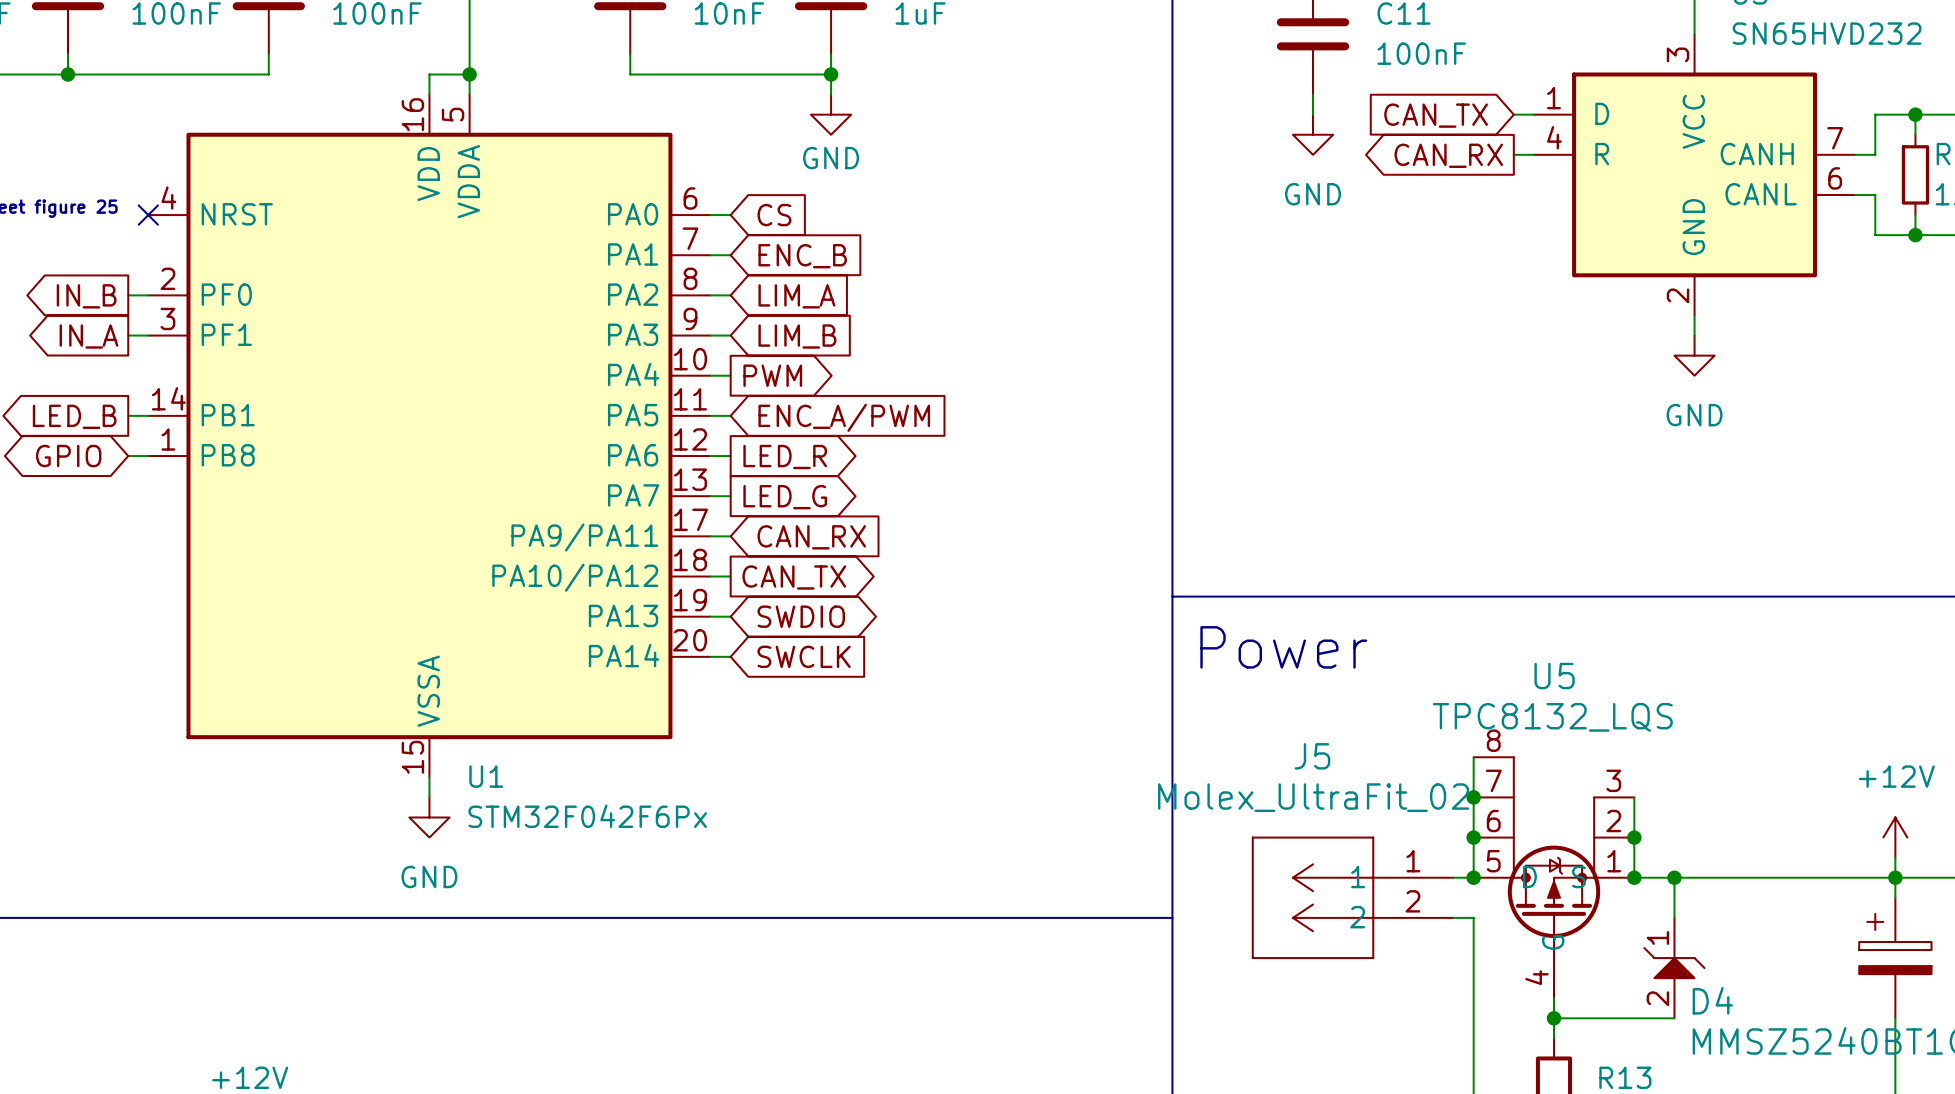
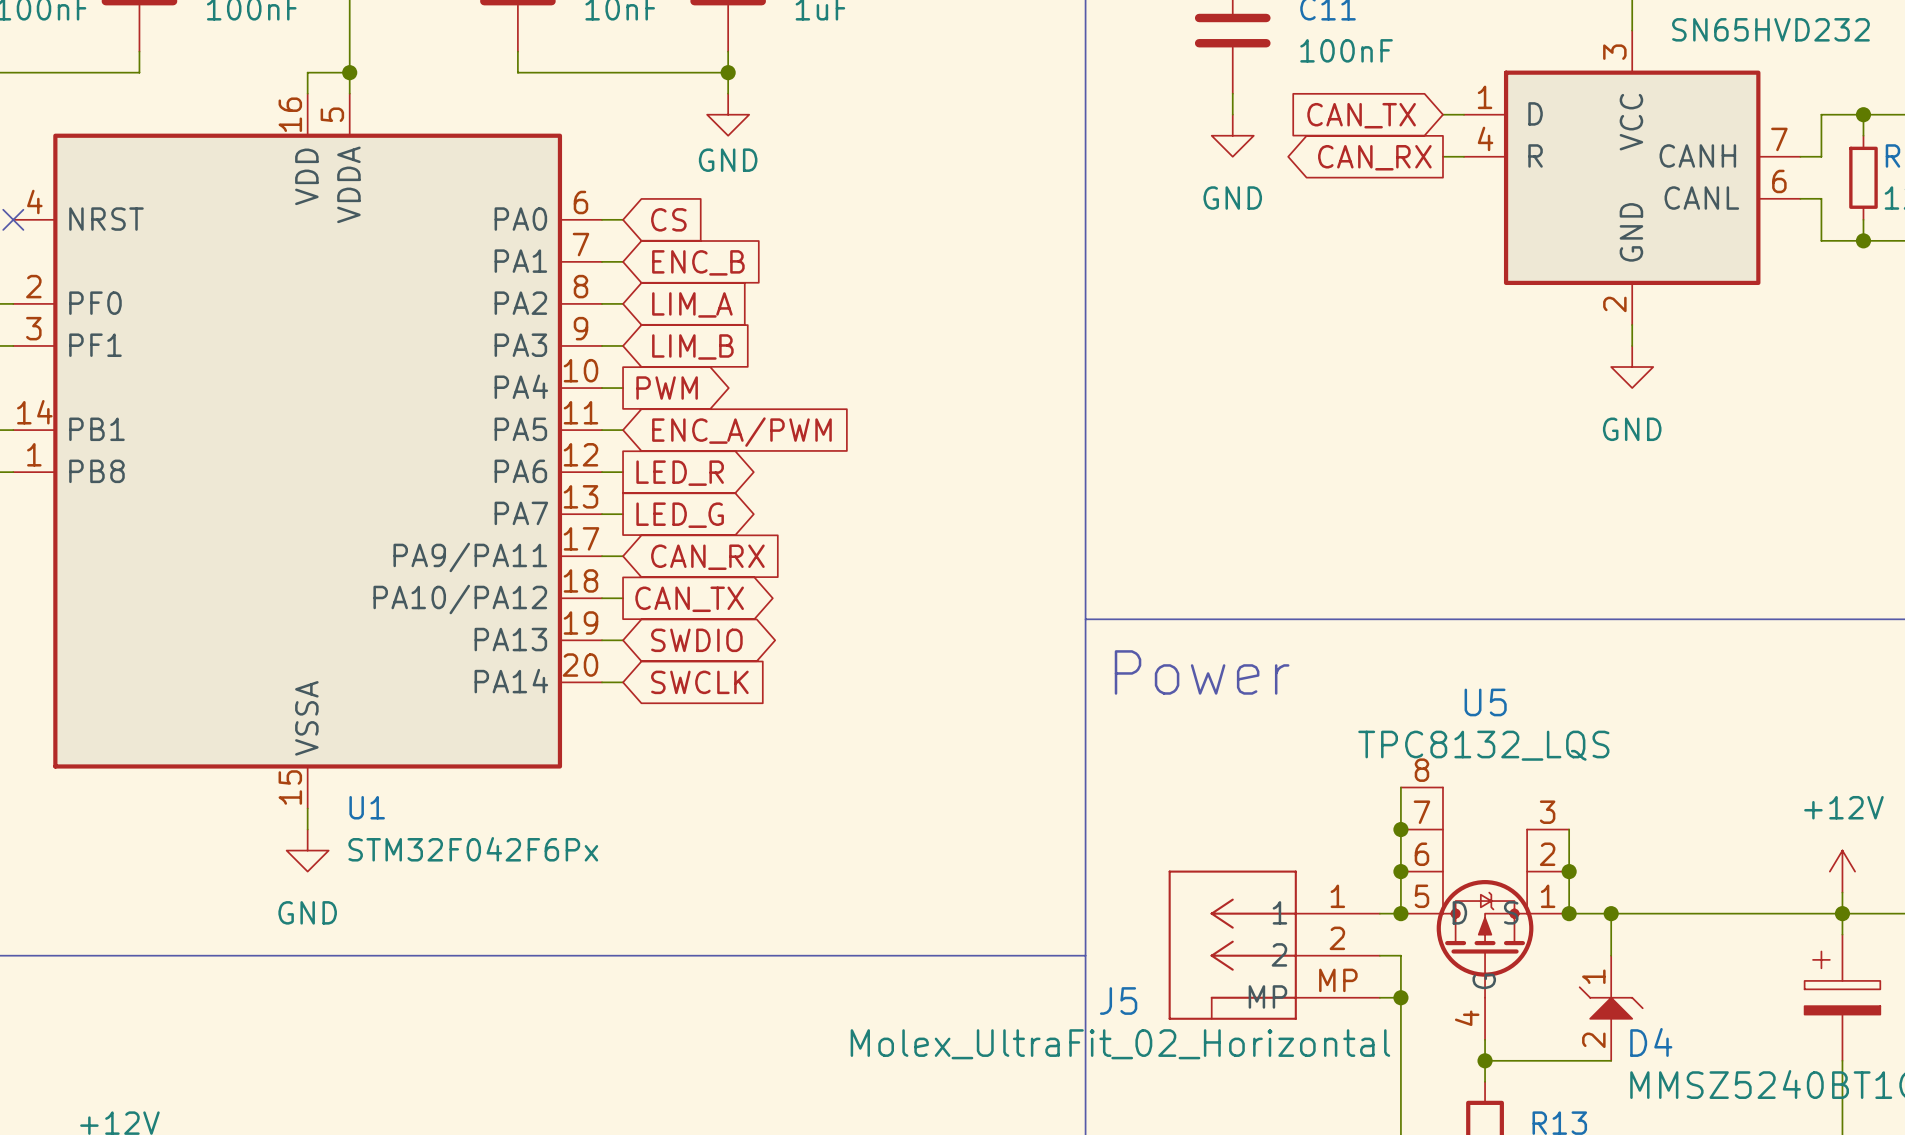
J5 name position: J5 (1312, 756) -> J5 (1118, 1001)
J5 value: Molex_UltraFit_02 (1313, 797) -> Molex_UltraFit_02_Horizontal (1120, 1044)
J5 symbol: [1251, 836, 1454, 960] -> [1168, 870, 1380, 1020]
wire: none -> (1379, 997) (1400, 997)
junction: none -> (1400, 997)

